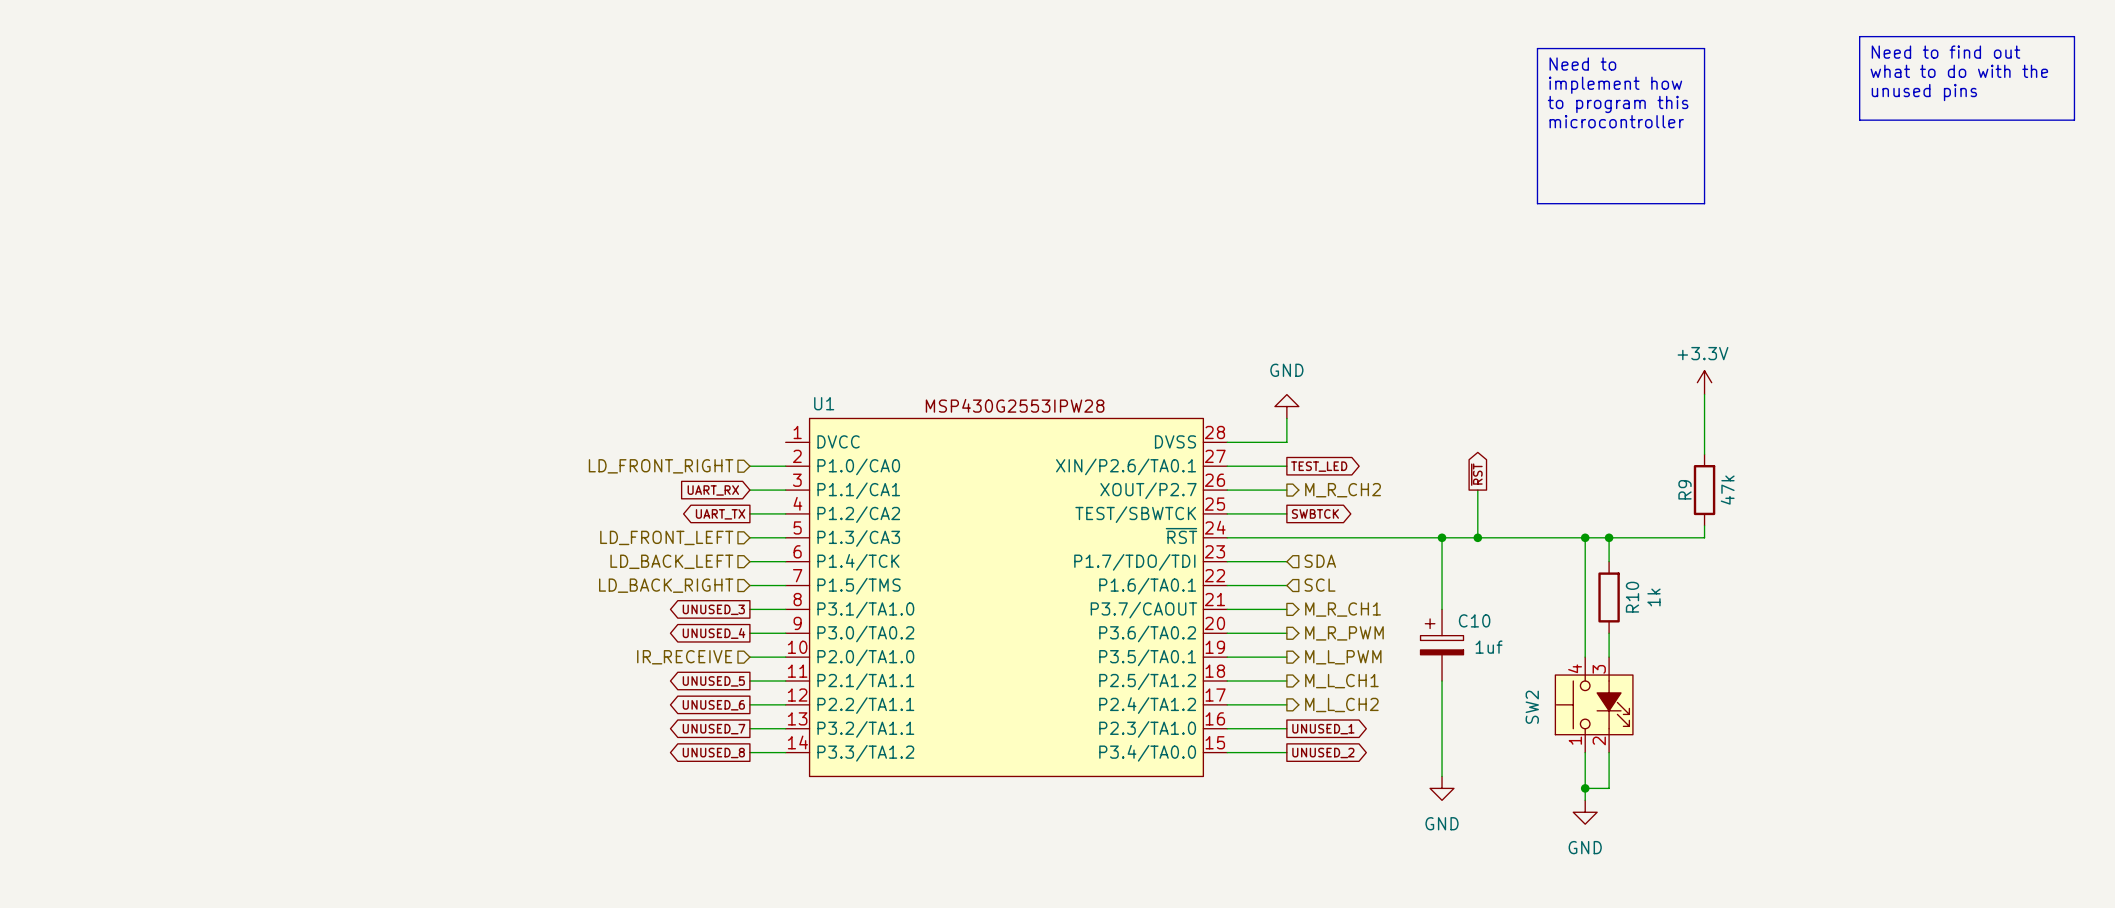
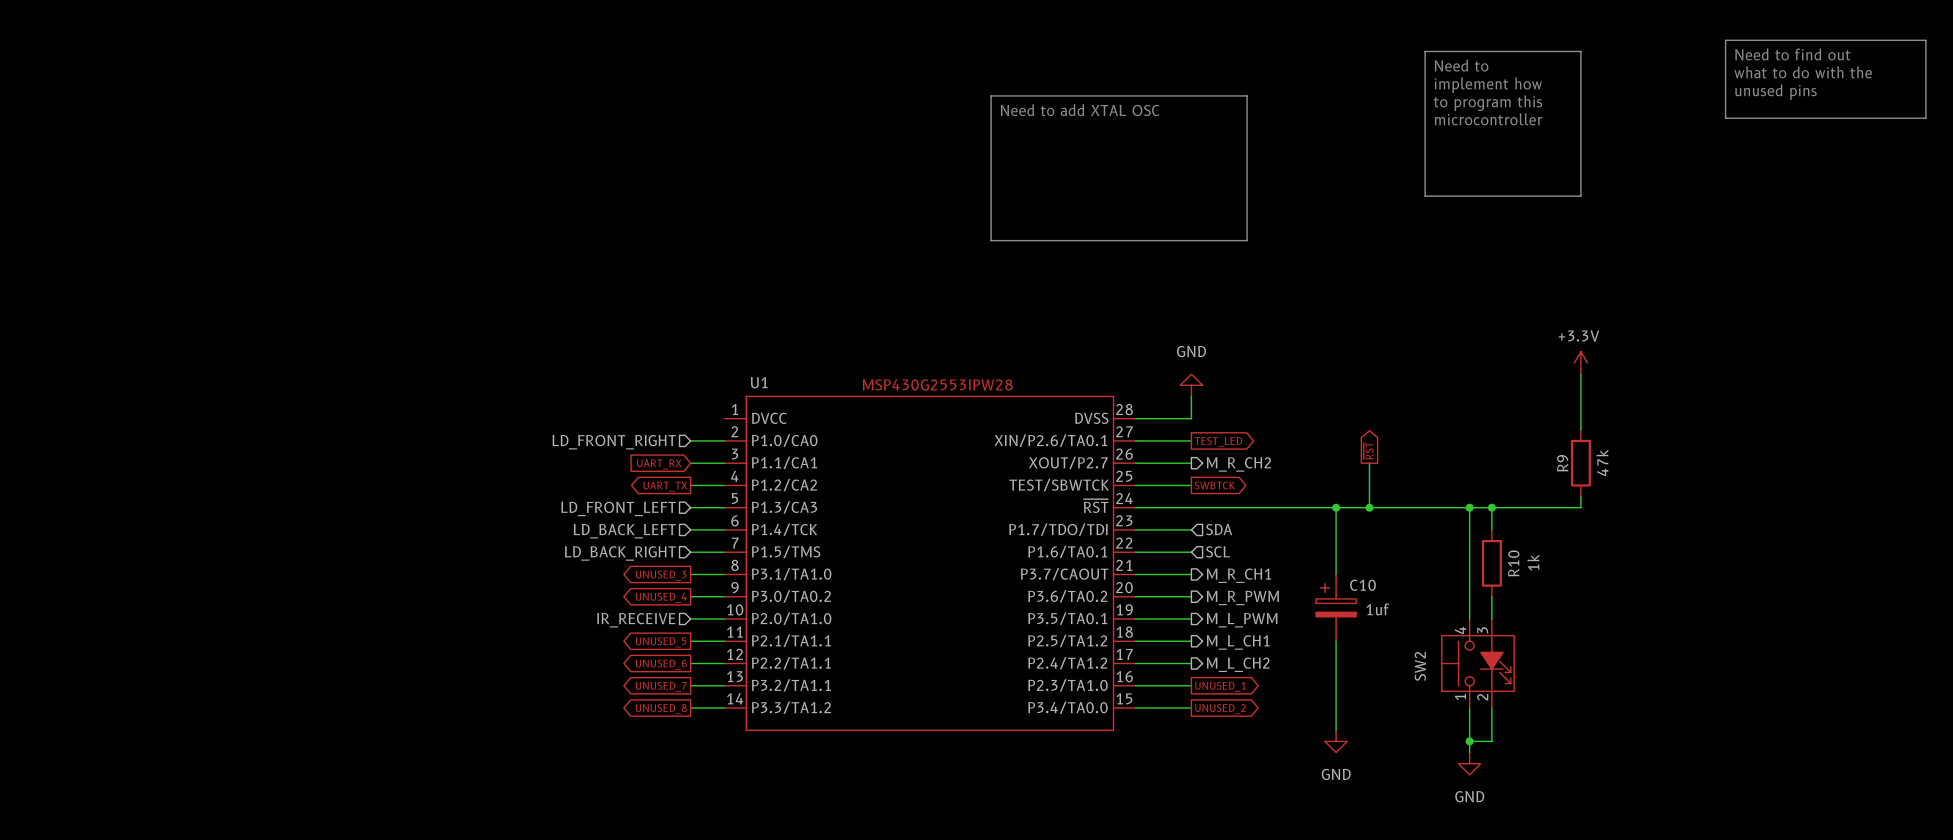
line: none -> (991, 95) (1247, 95) (1247, 240) (991, 240) (991, 95)
text: none -> Need to add XTAL OSC (1080, 110)

